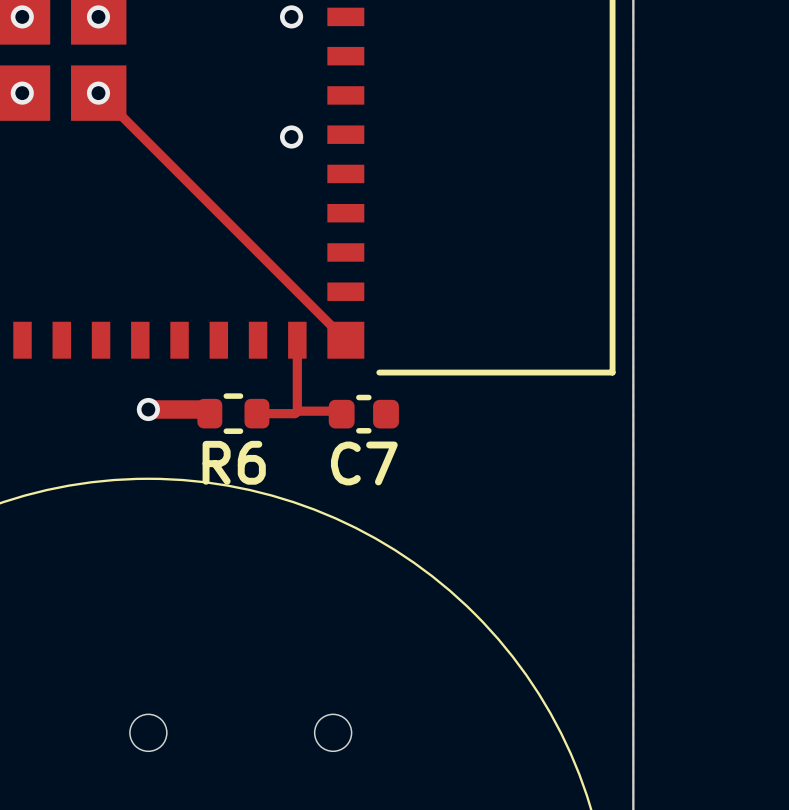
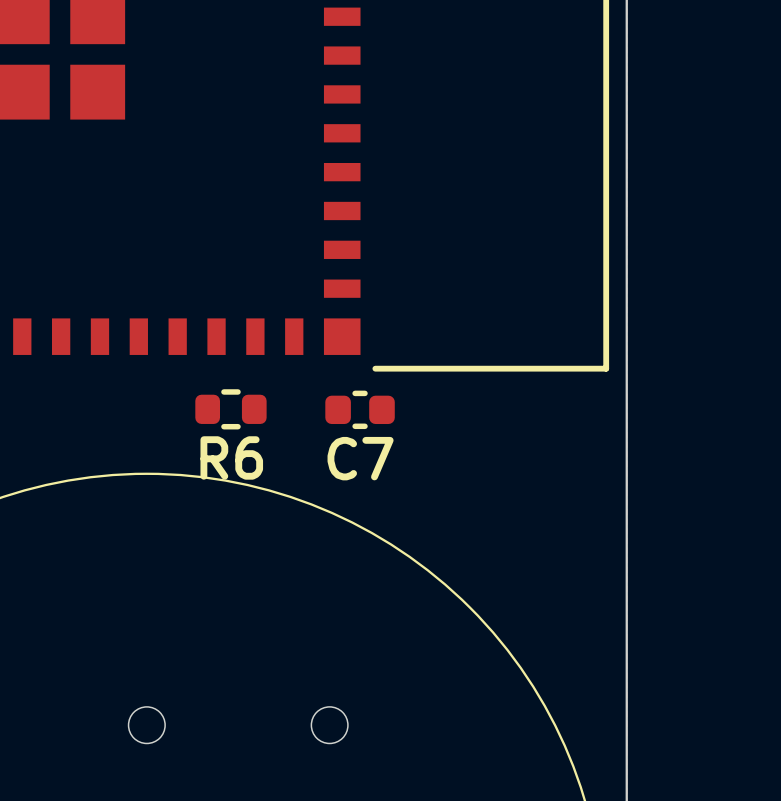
via: (22, 16) -> none
via: (98, 16) -> none
via: (291, 16) -> none
via: (22, 93) -> none
track: (98, 93) (345, 340) -> none
via: (98, 93) -> none
via: (291, 137) -> none
track: (297, 340) (297, 411) -> none
track: (148, 409) (205, 409) (209, 413) -> none
via: (148, 409) -> none
track: (297, 411) (294, 413) (256, 413) -> none
track: (297, 411) (338, 411) (341, 414) -> none

